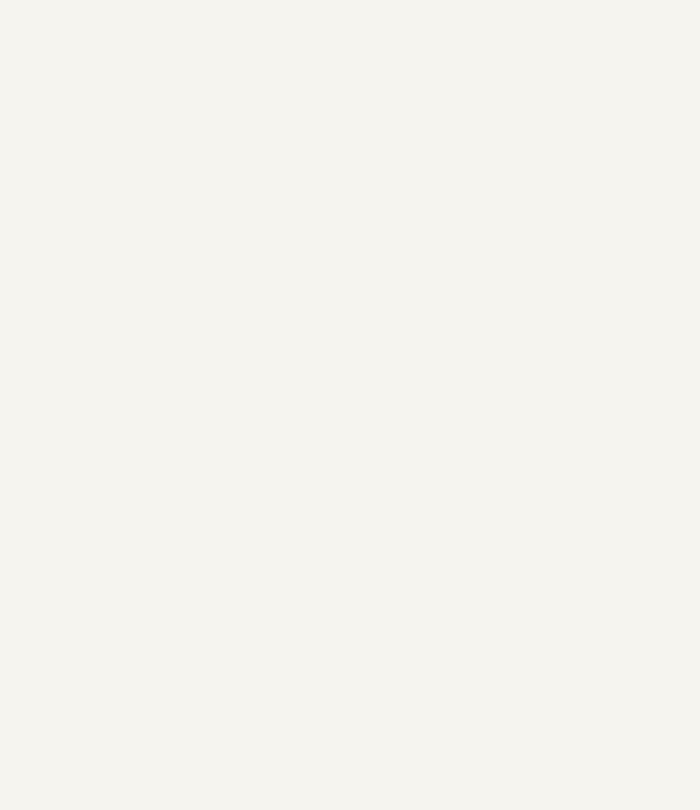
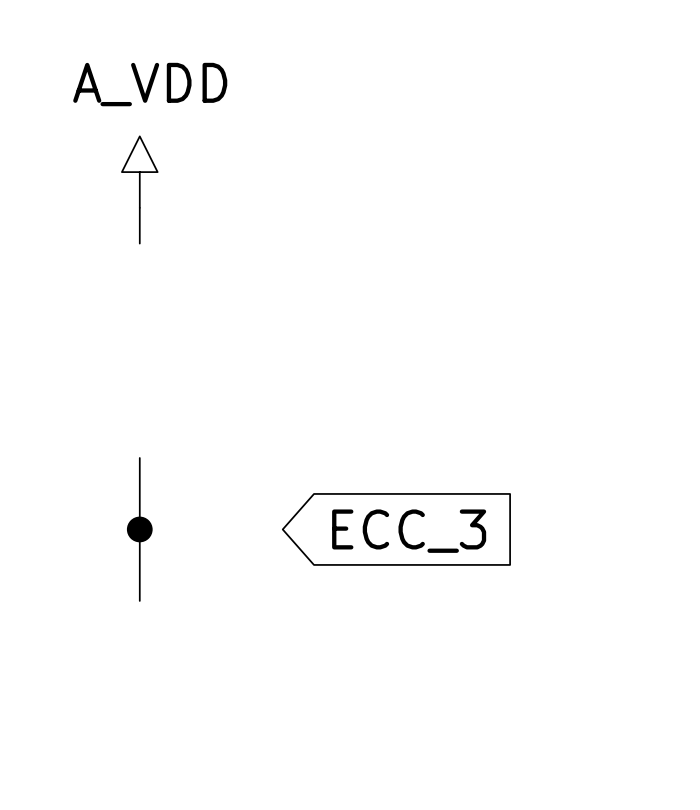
power symbol: none -> A_VDD (139, 172)
wire: none -> (139, 207) (139, 243)
wire: none -> (139, 457) (139, 600)
junction: none -> (139, 529)
global label: none -> ECC_3 (409, 531)

